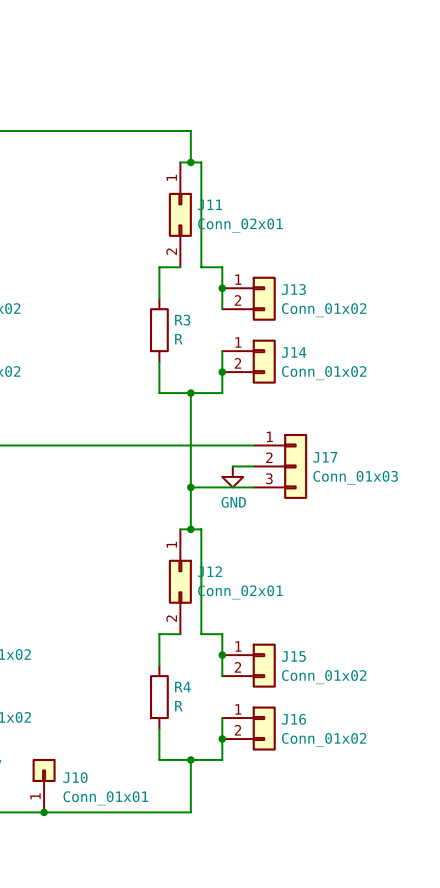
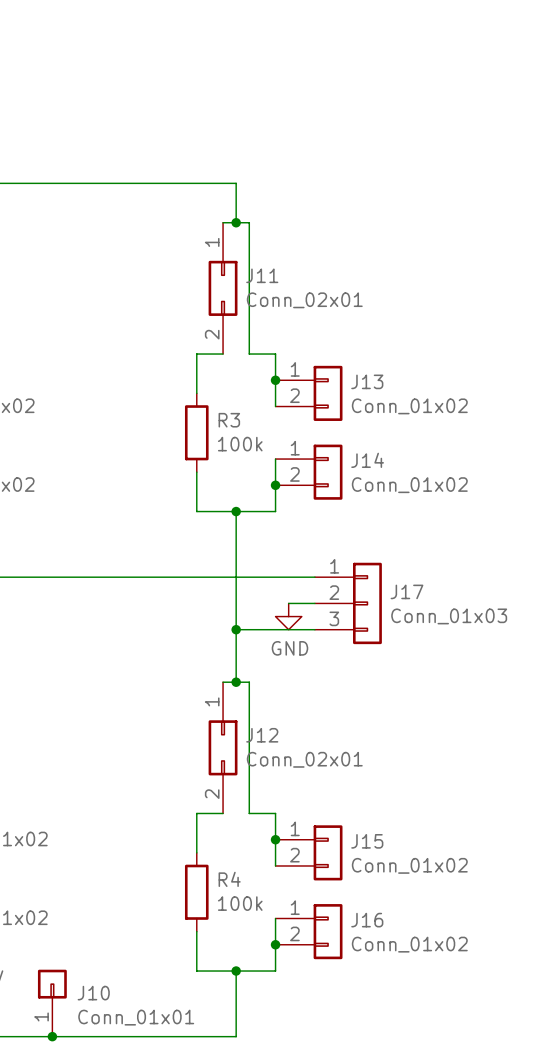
R3 value: R (178, 339) -> 100k (240, 444)
R4 value: R (178, 706) -> 100k (240, 903)

